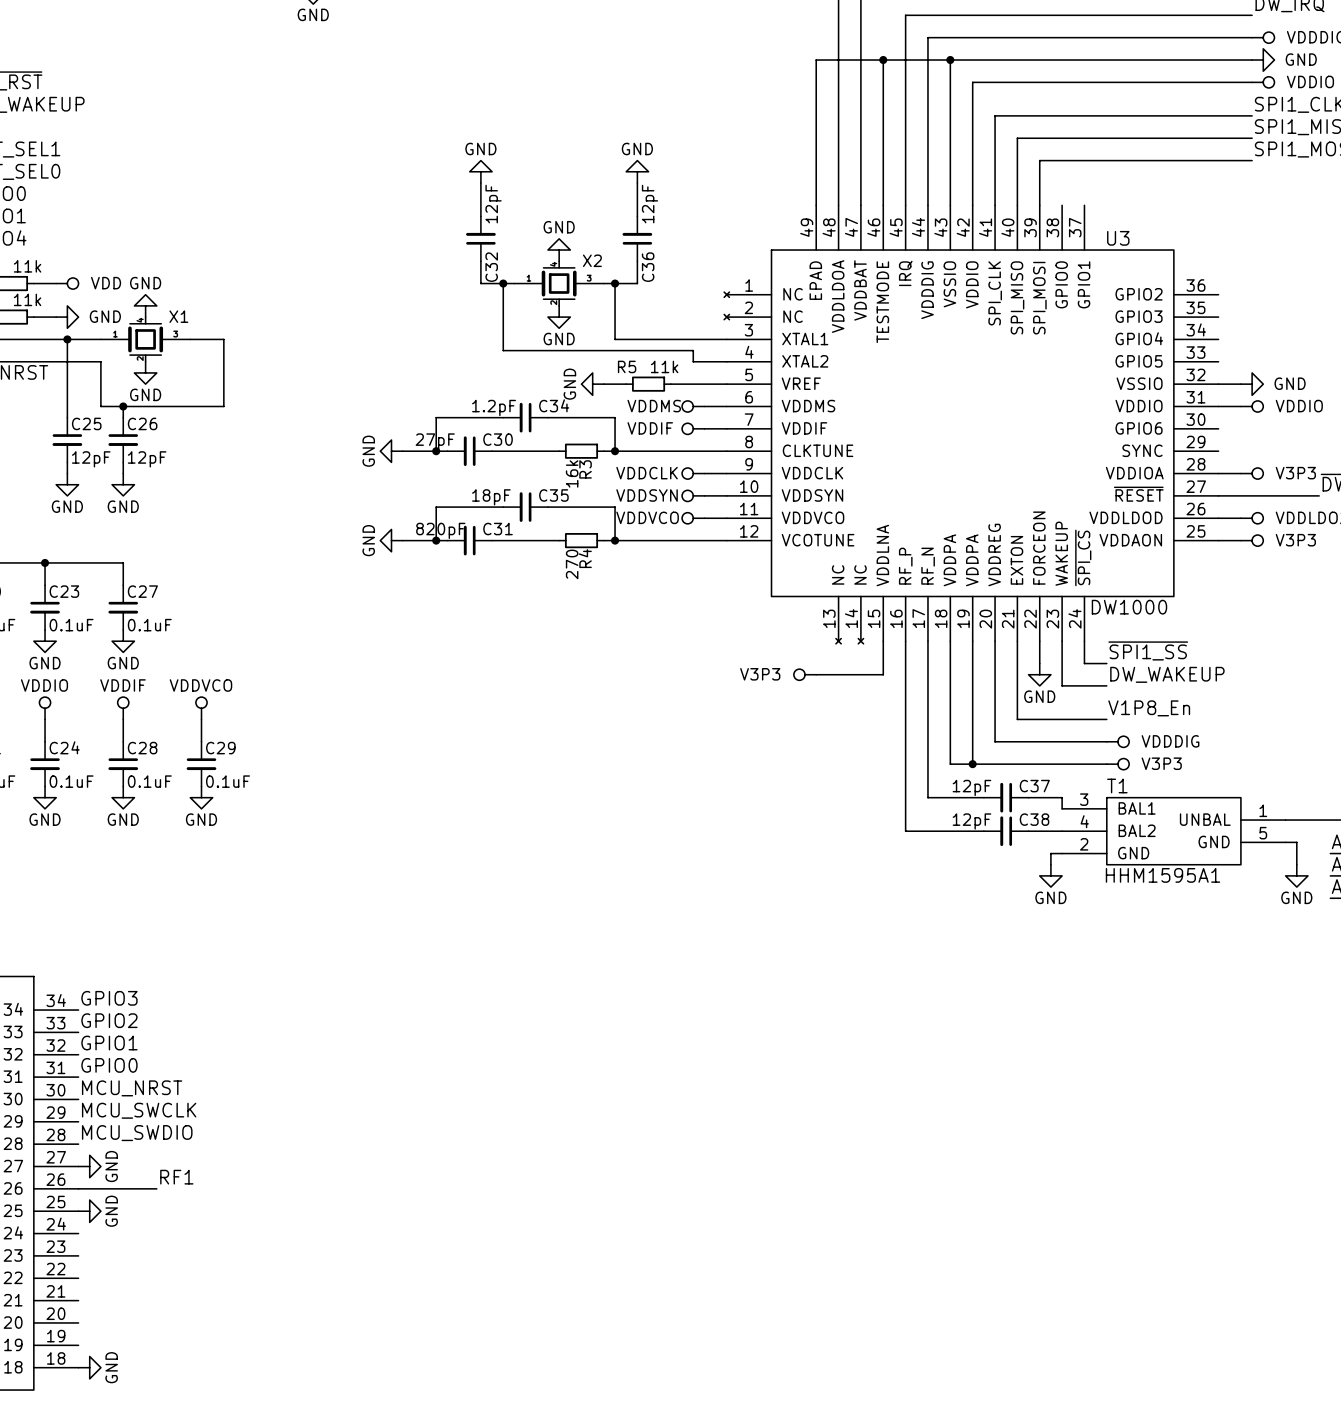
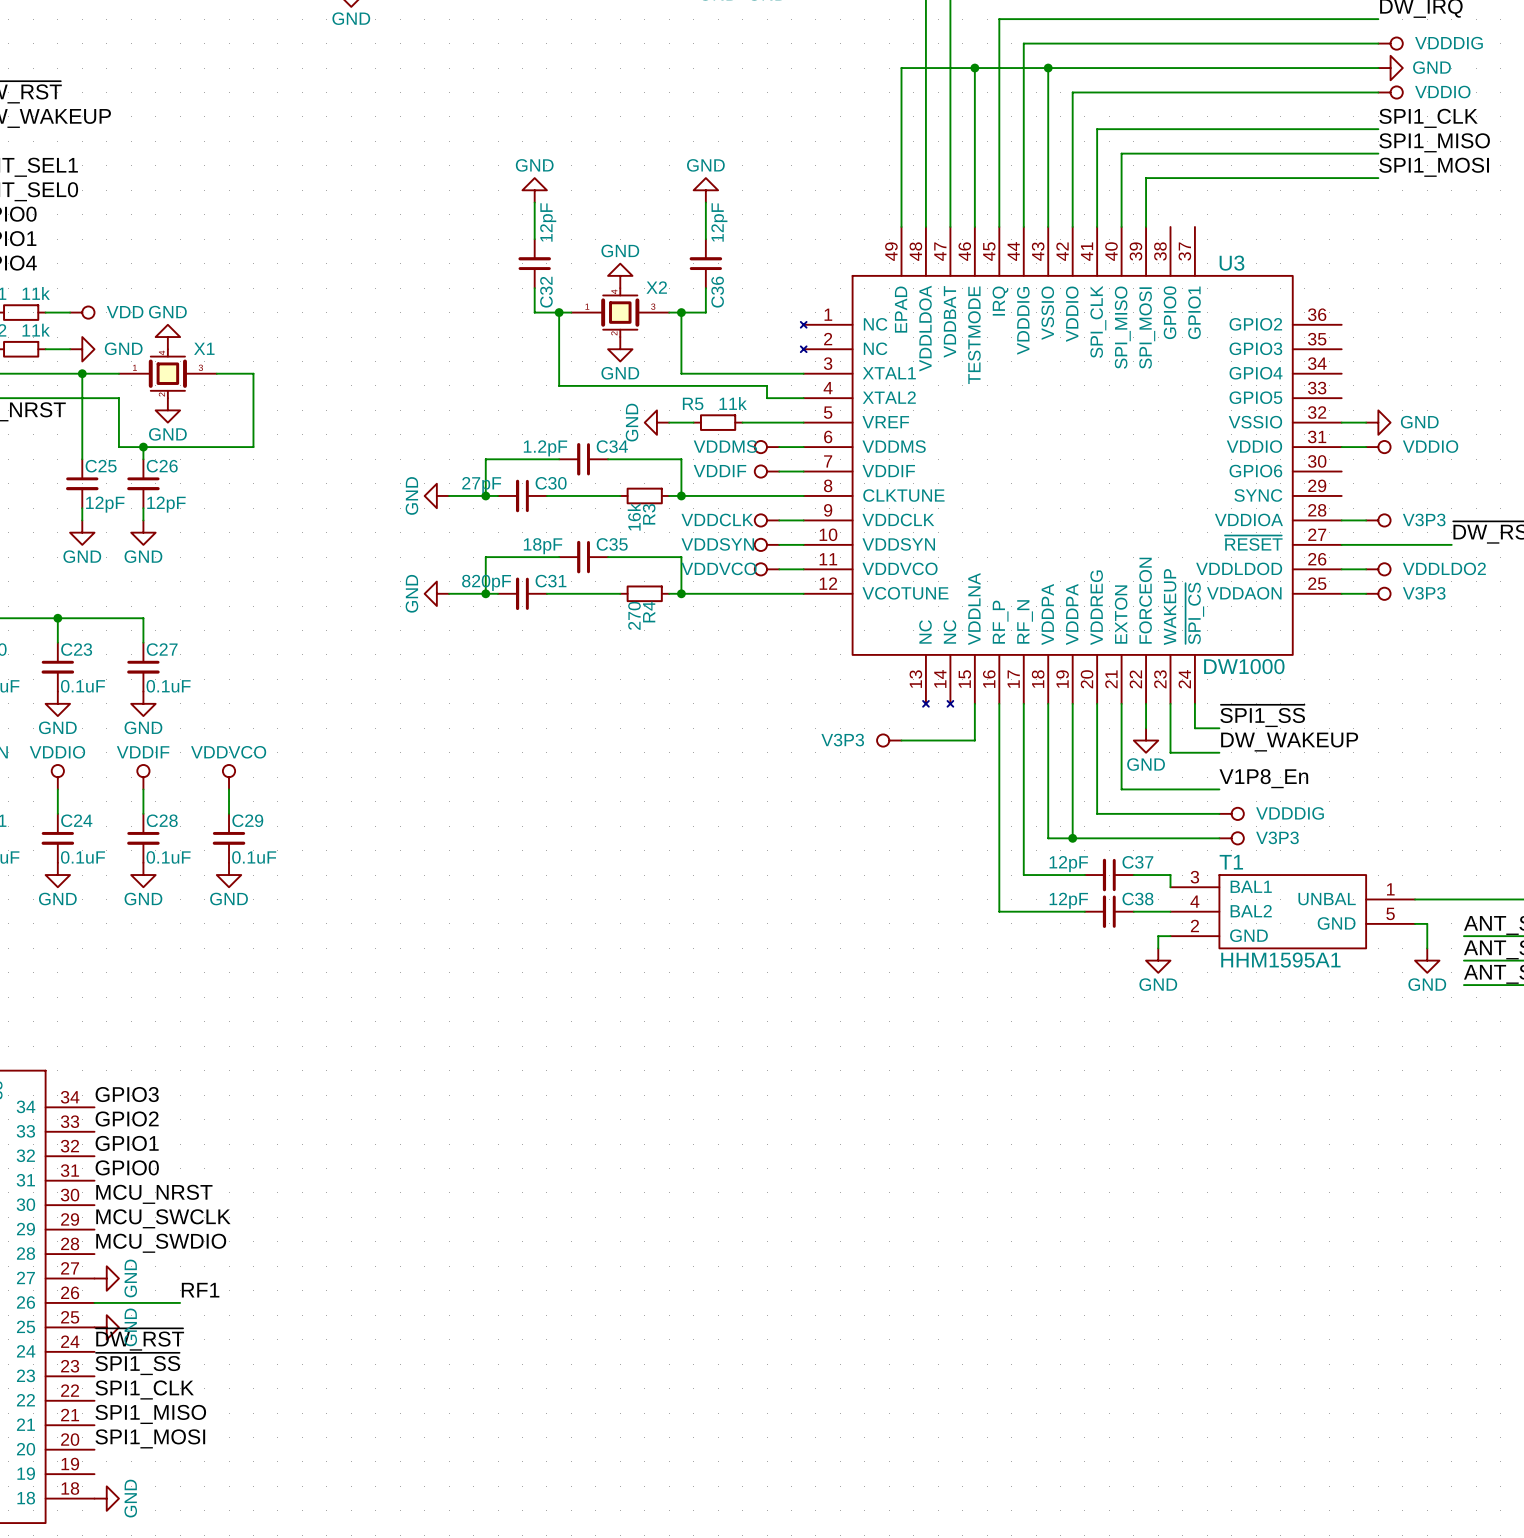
label: none -> ~{DW_RST} (140, 1339)
label: none -> ~{SPI1_SS} (137, 1363)
label: none -> SPI1_CLK (144, 1389)
label: none -> SPI1_MISO (150, 1414)
label: none -> SPI1_MOSI (150, 1438)

